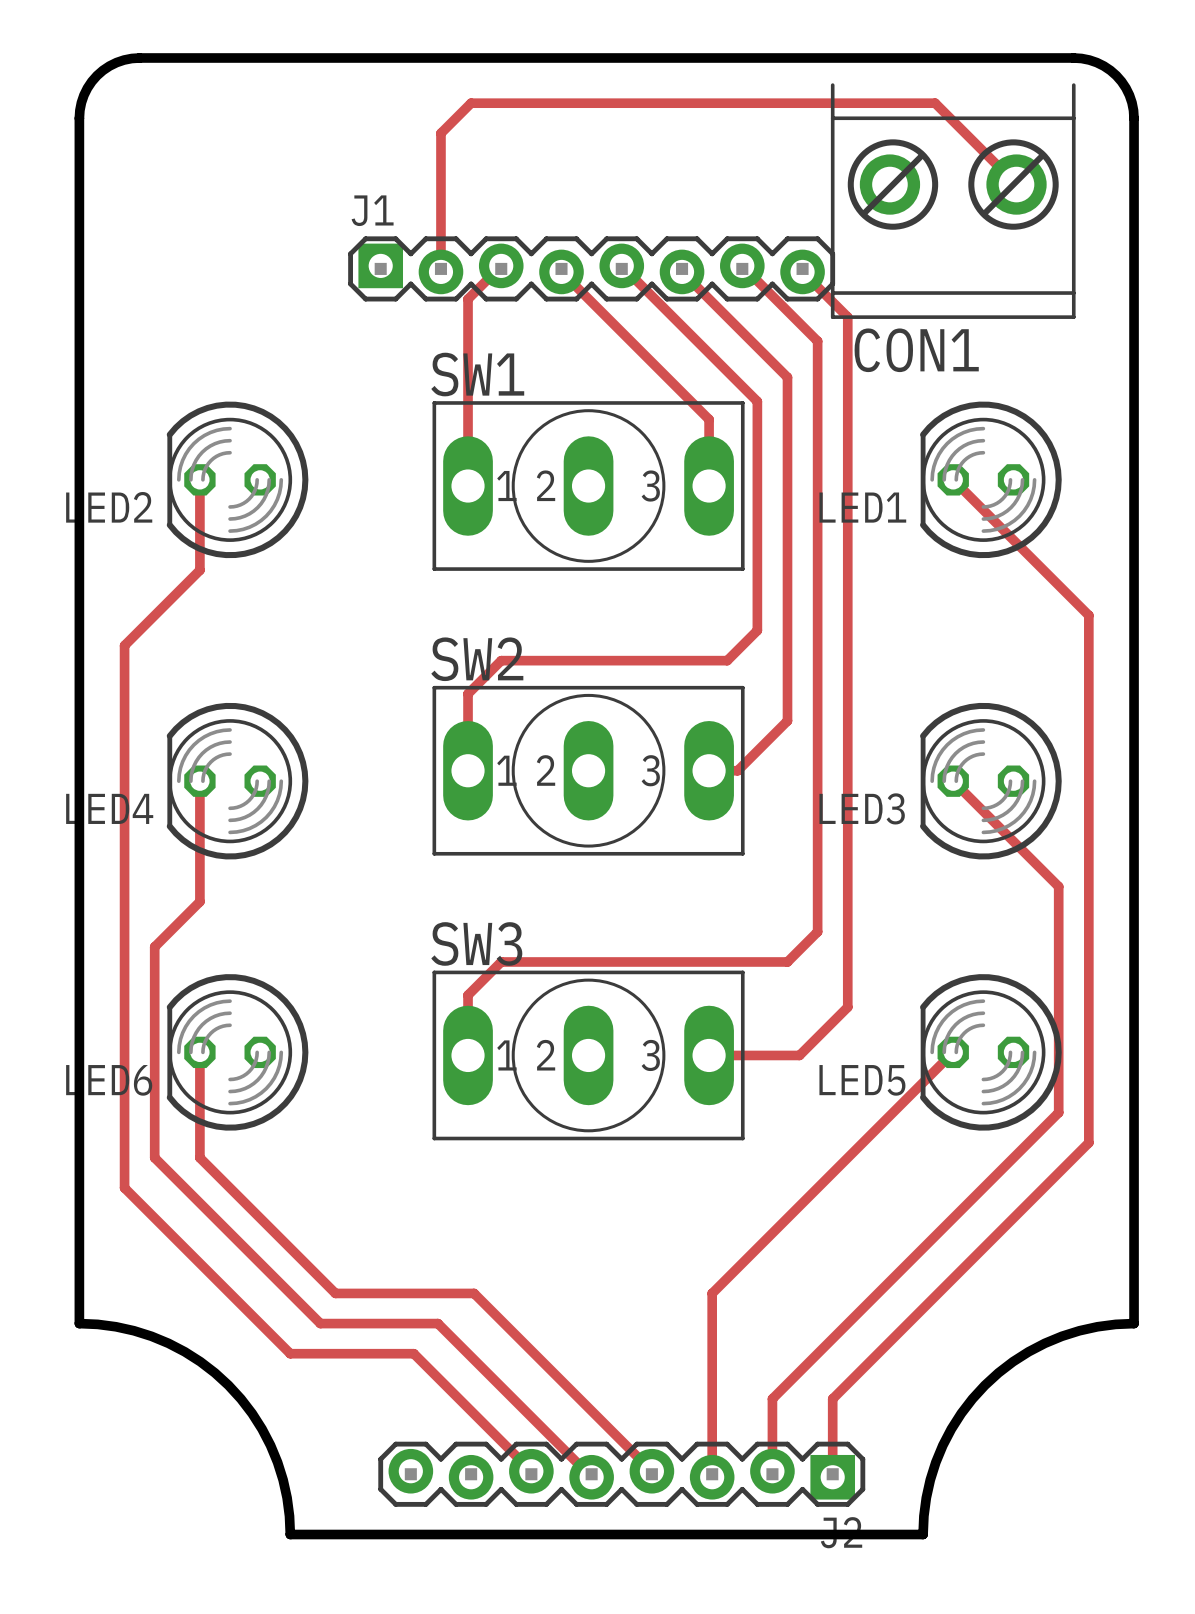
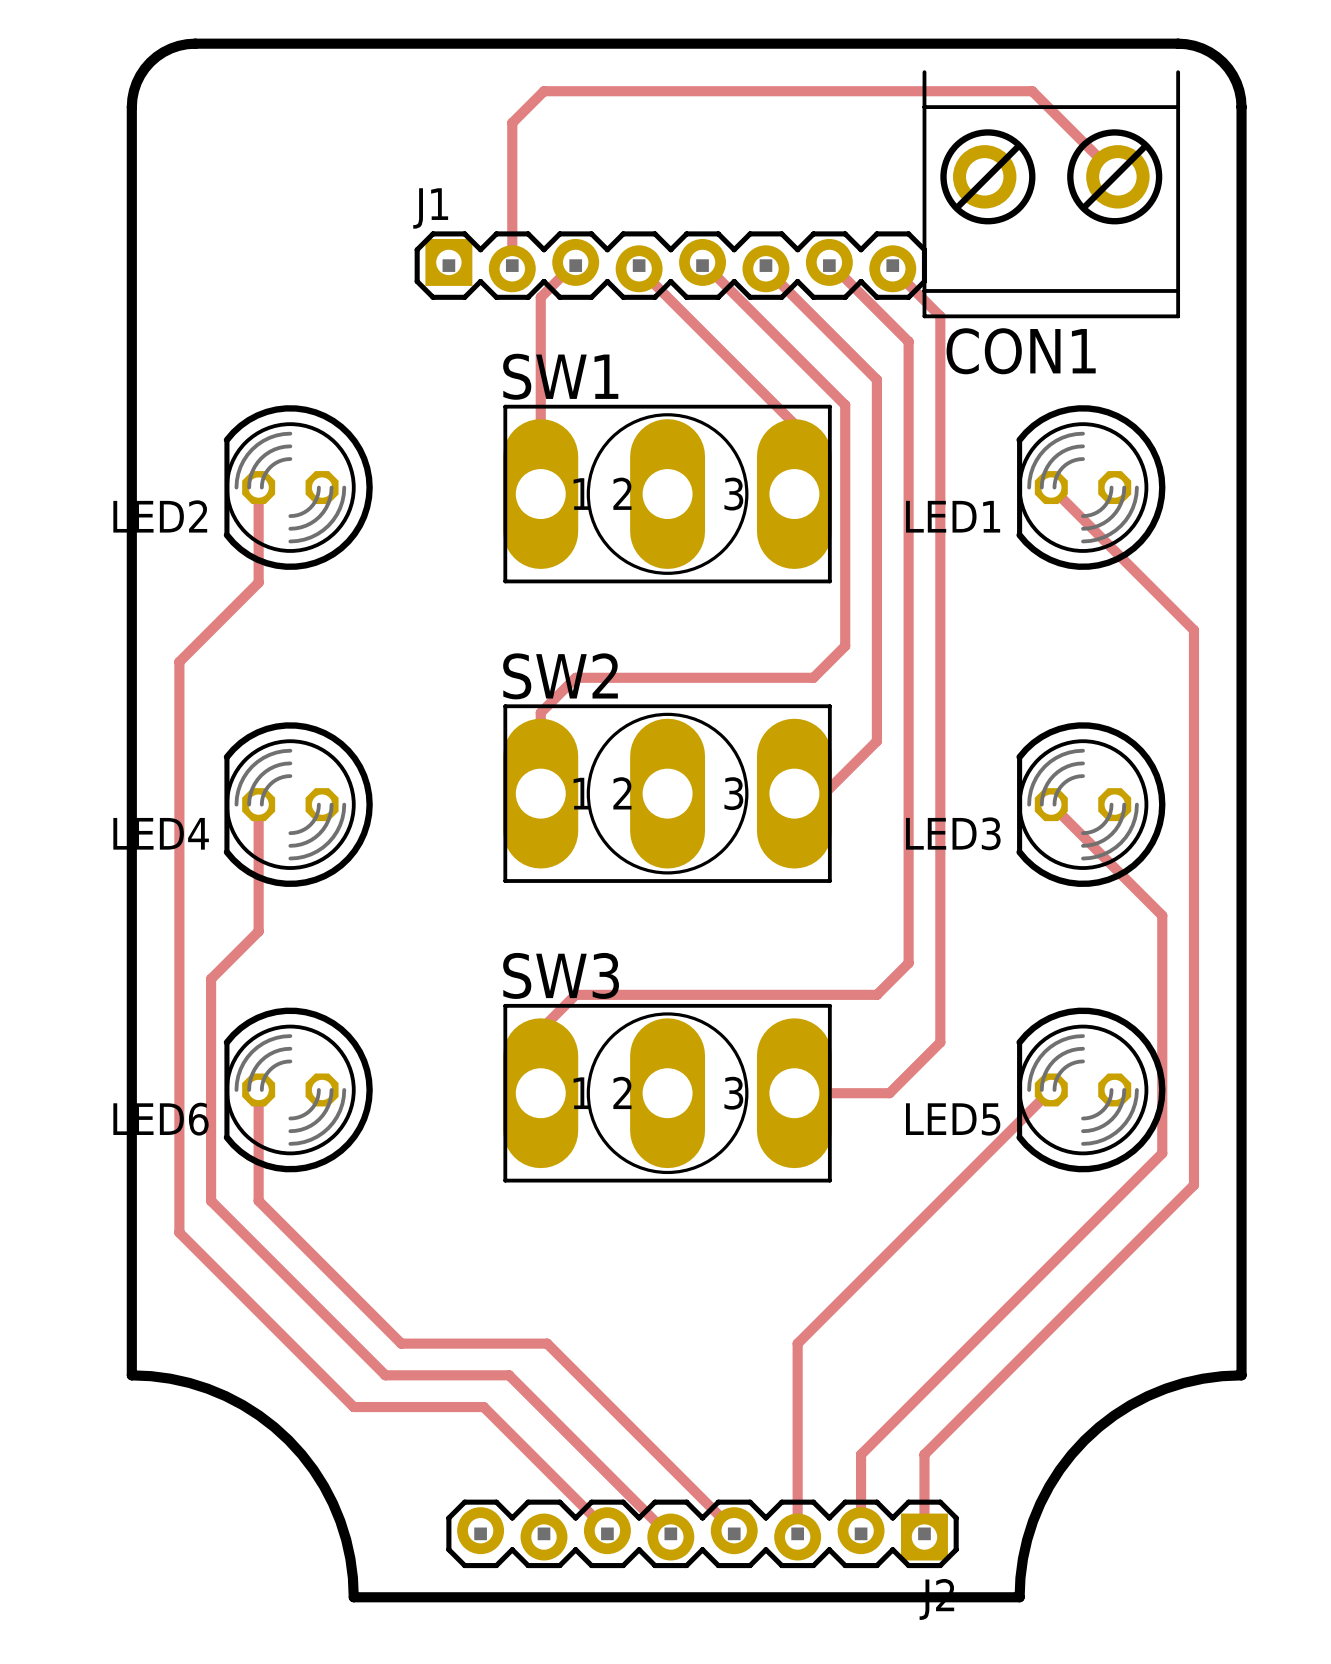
SW1 footprint: [432, 401, 745, 571] -> [503, 404, 832, 584]
SW2 footprint: [432, 685, 745, 856] -> [503, 704, 832, 883]
SW3 footprint: [432, 970, 745, 1141] -> [503, 1003, 832, 1183]

